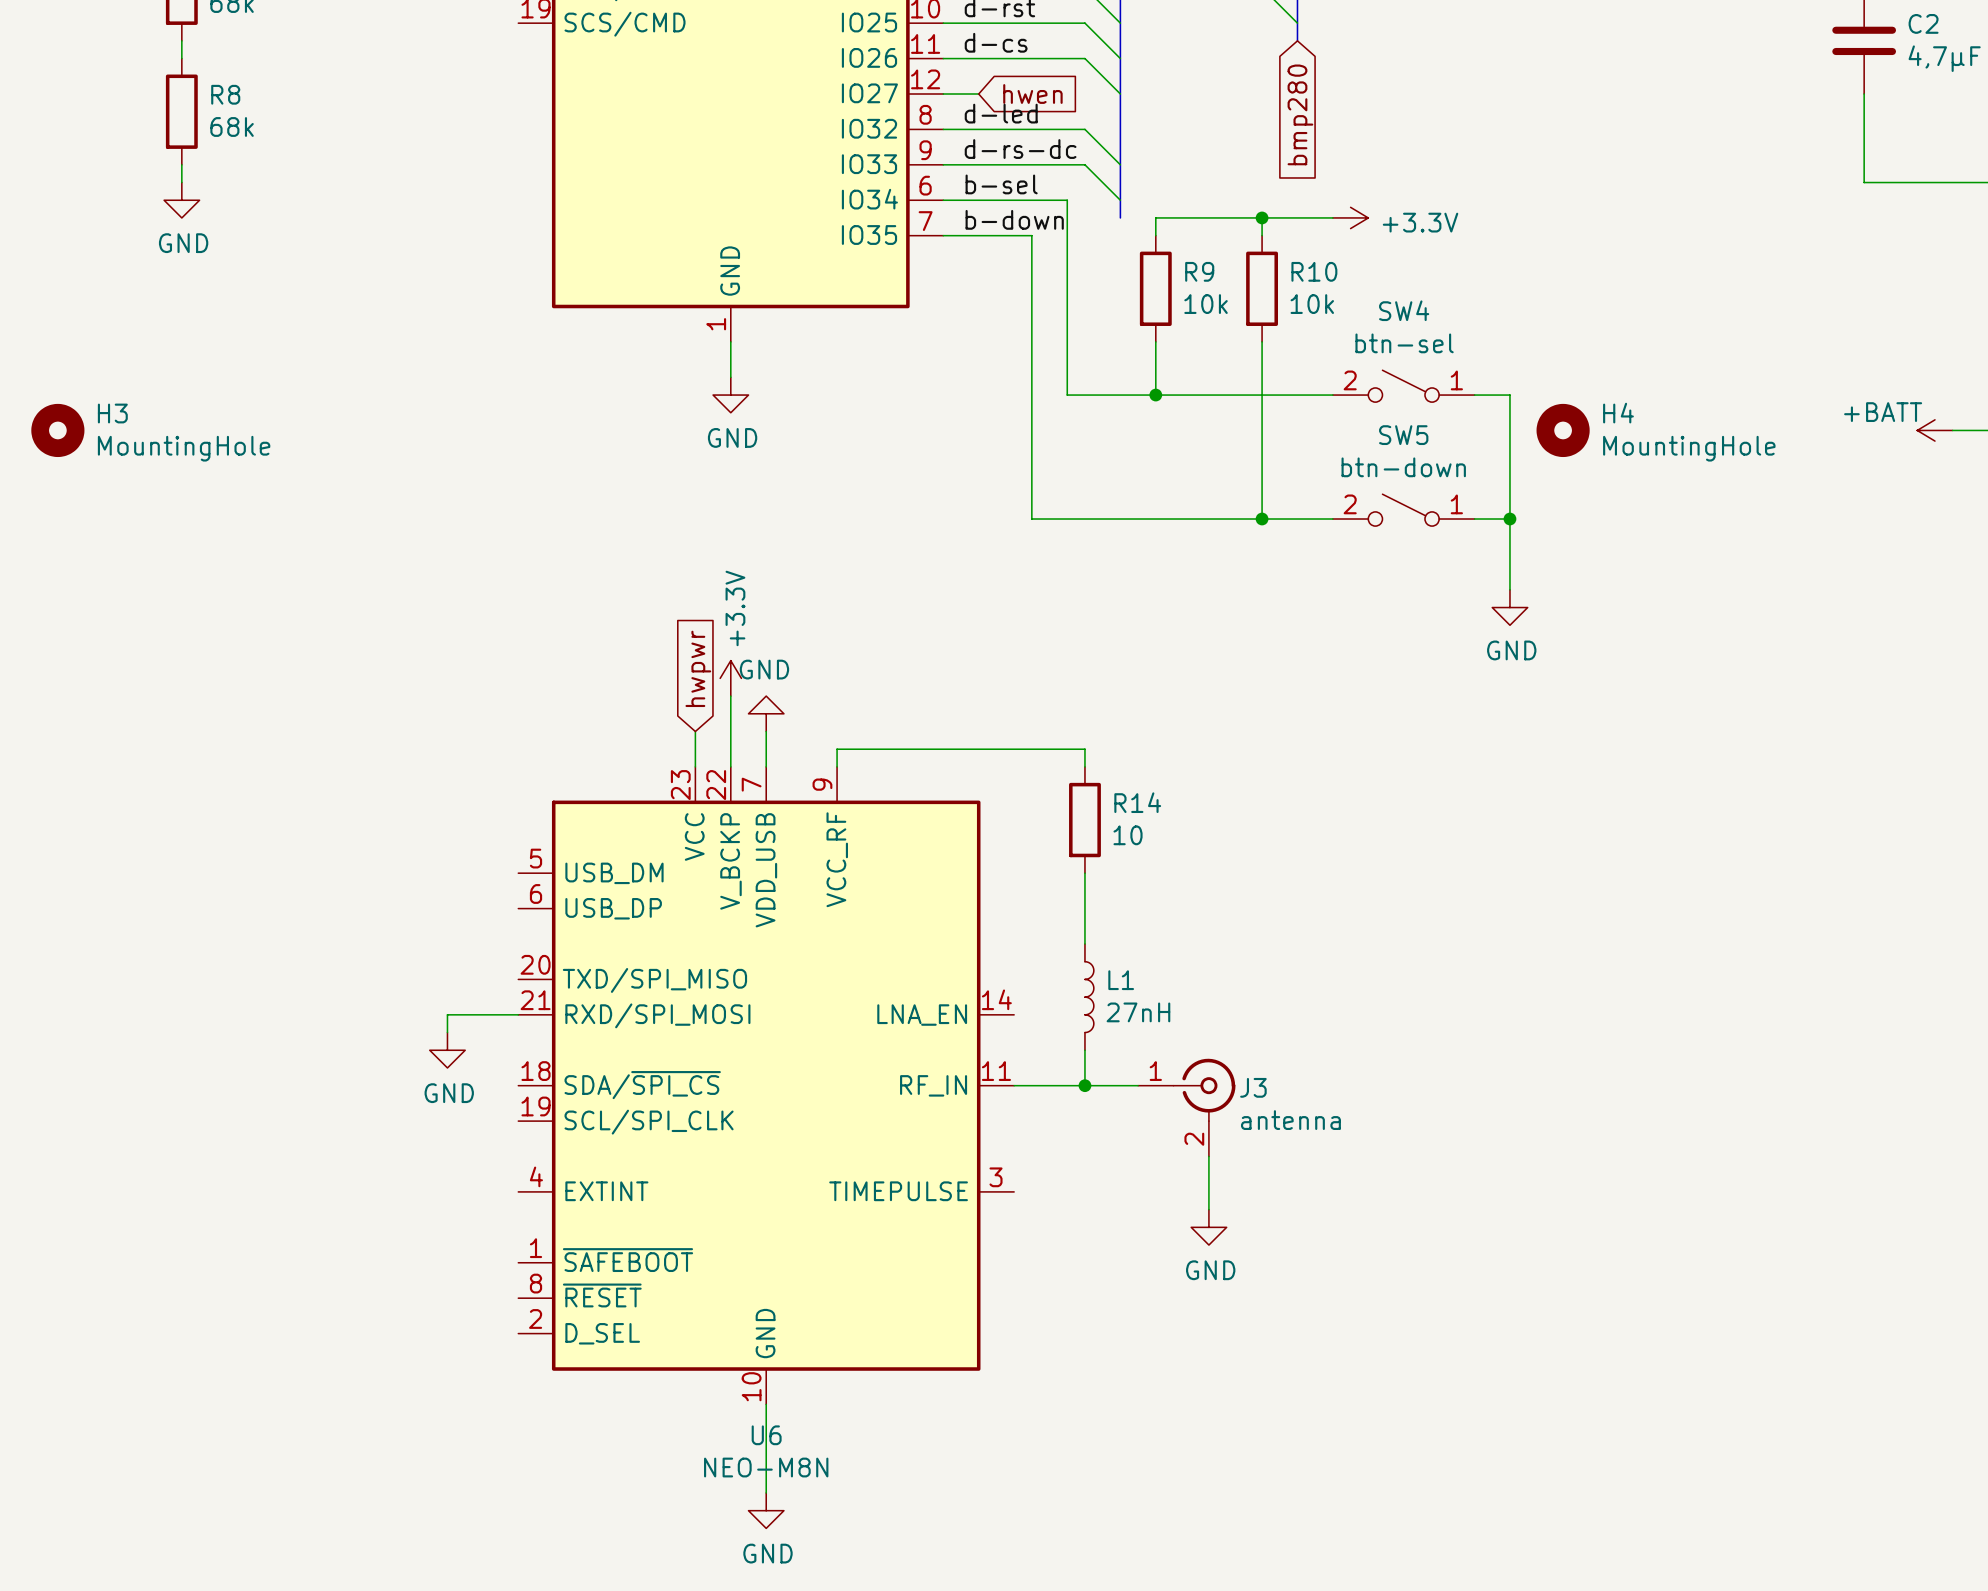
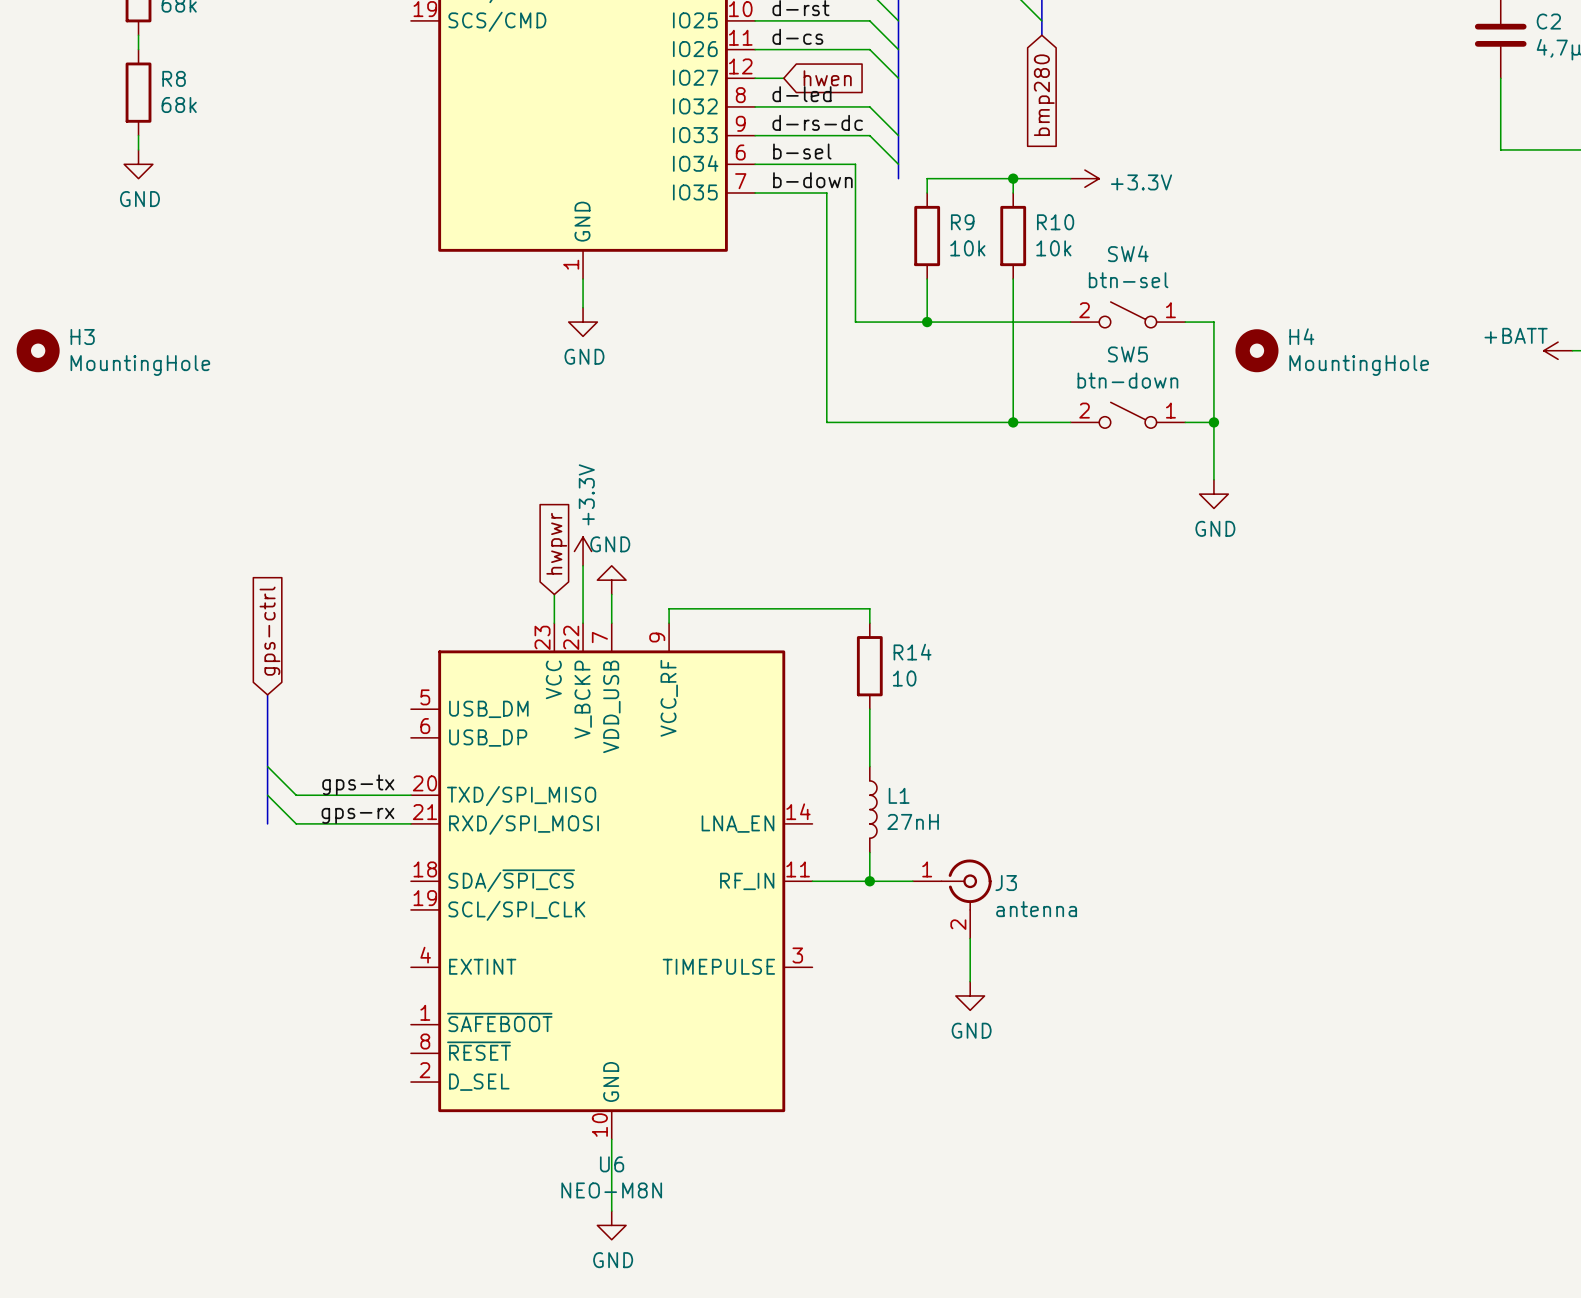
global label: none -> gps-ctrl (269, 631)
bus: none -> (267, 694) (267, 823)
wire: none -> (267, 766) (296, 795) (410, 795)
label: none -> gps-tx (358, 784)
label: none -> gps-rx (357, 815)
wire: (447, 1014) (447, 1032) -> (353, 823) (296, 823) (267, 795)
power symbol: GND (447, 1050) -> none

